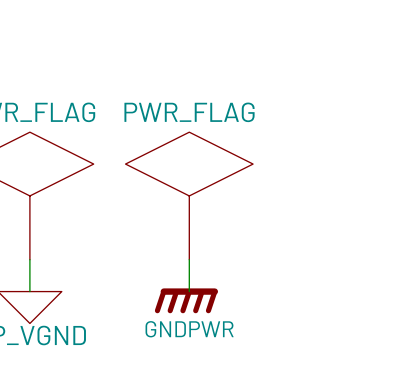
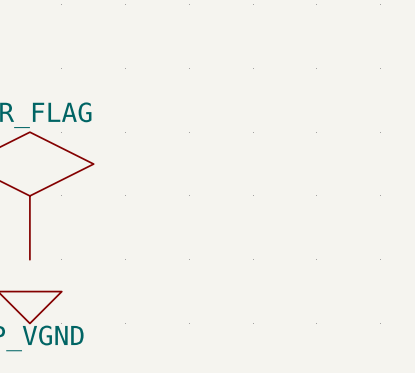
power symbol: PWR_FLAG (189, 195) -> none
wire: (29, 259) (29, 291) -> none
wire: (189, 259) (189, 291) -> none
power symbol: GNDPWR (186, 300) -> none

